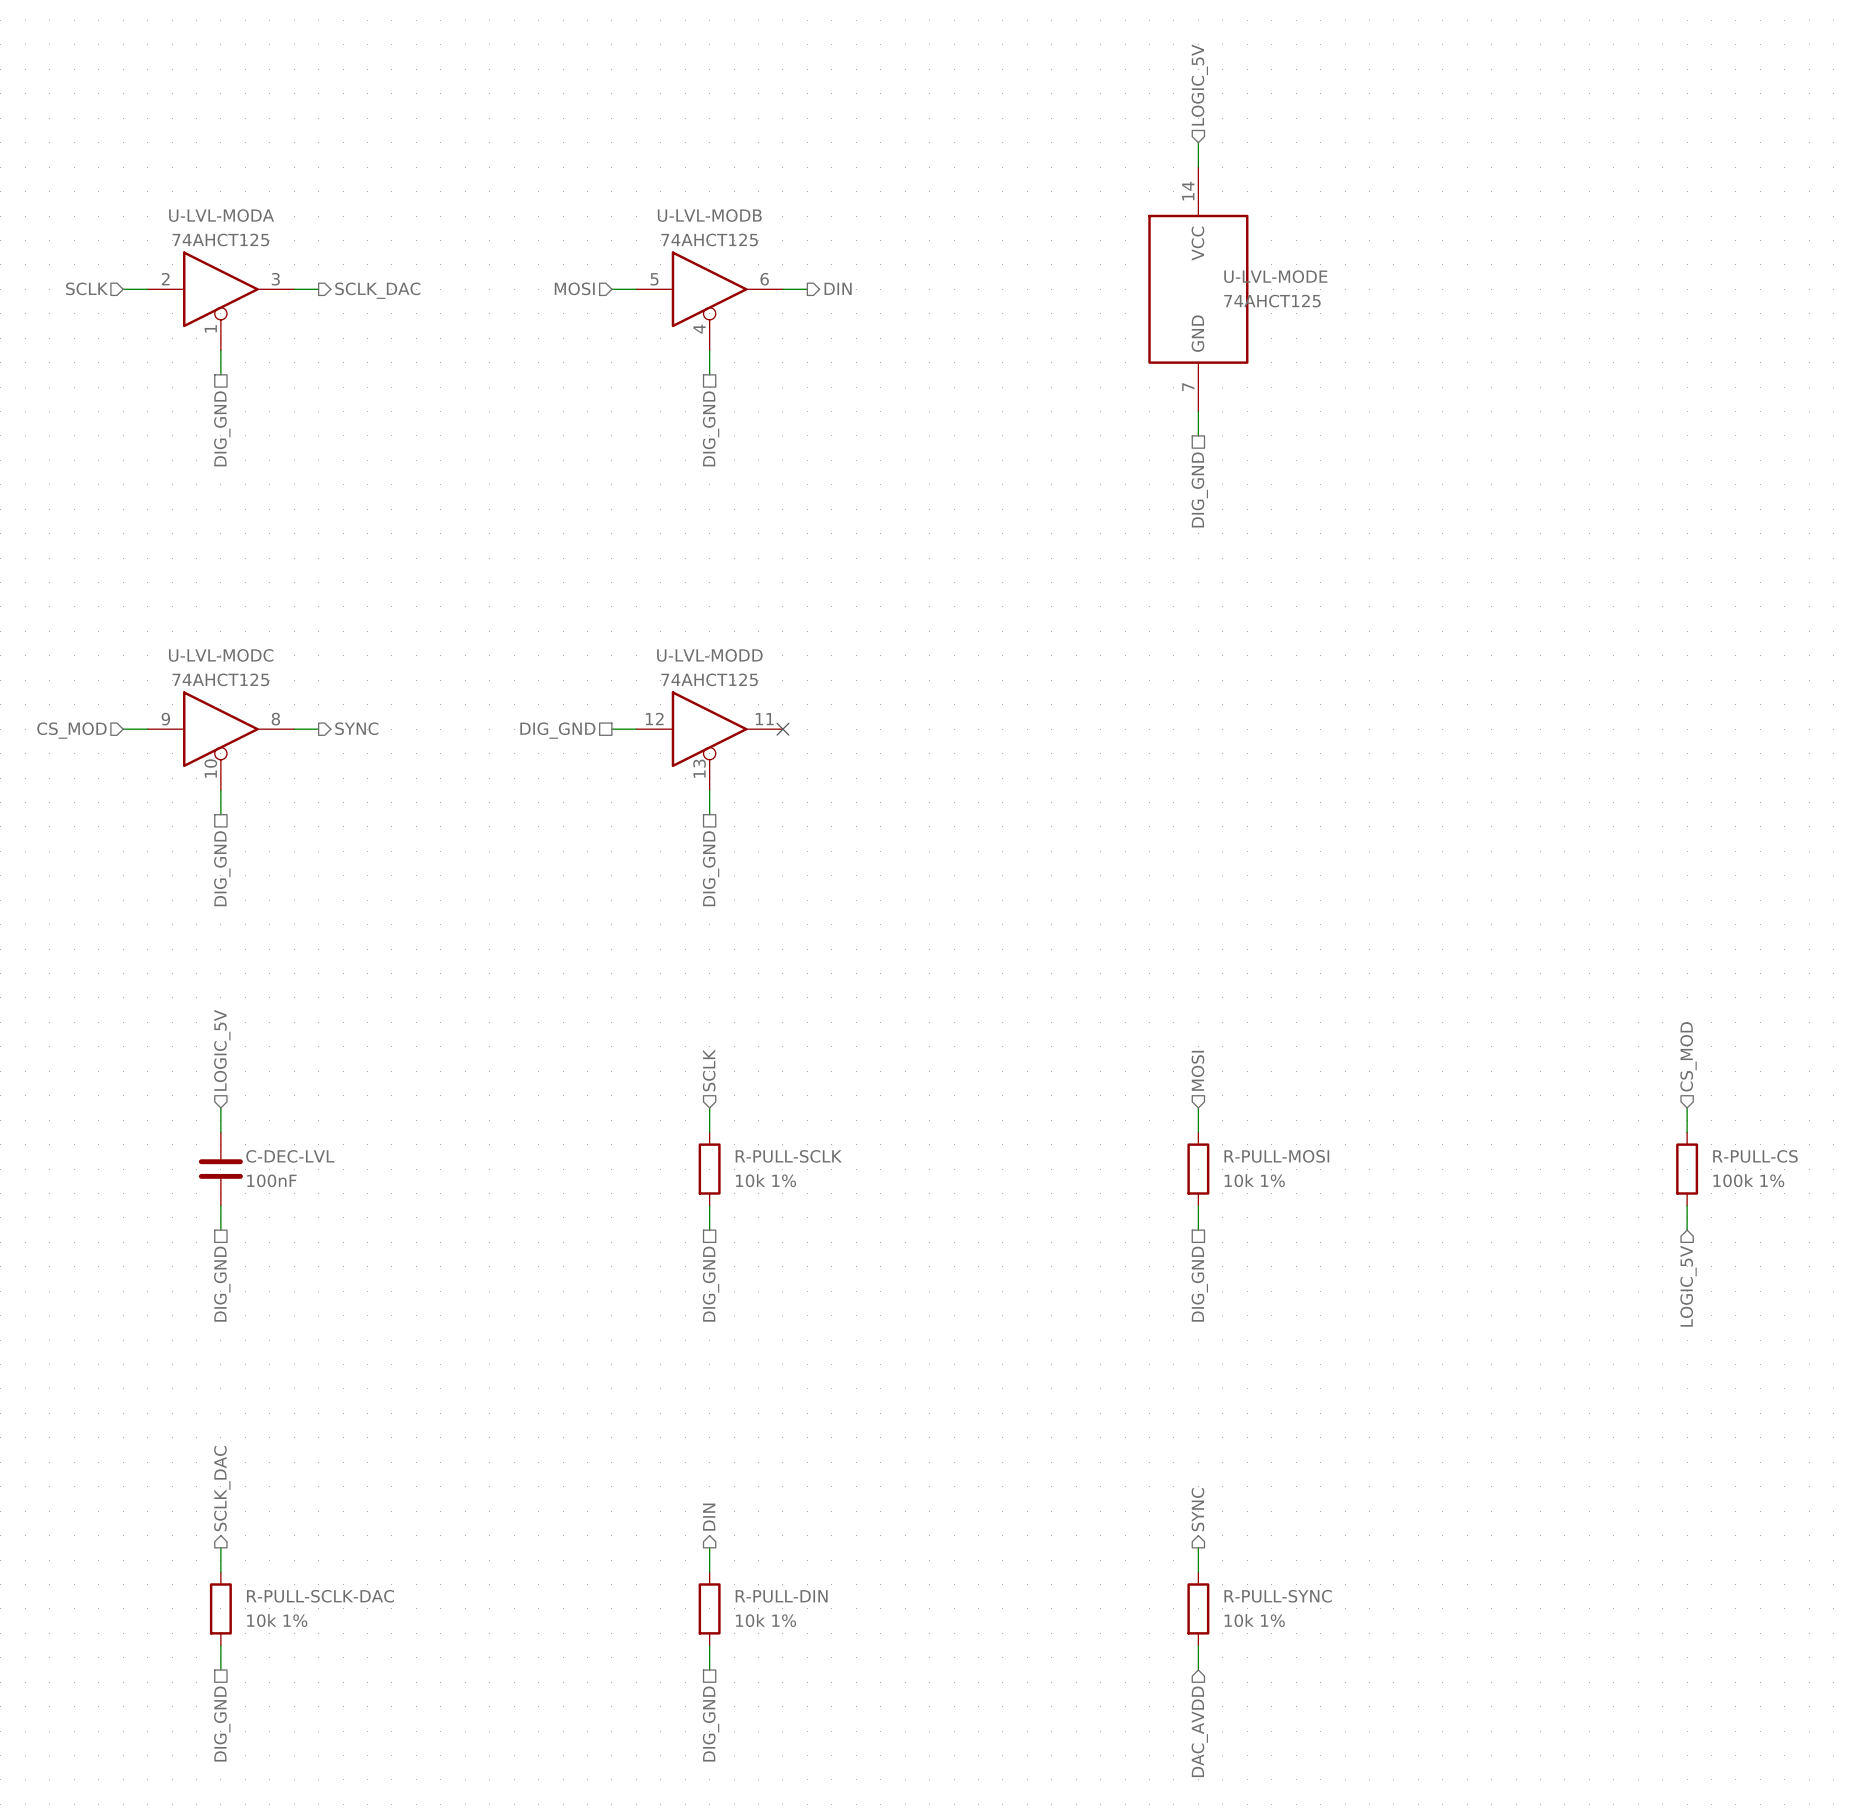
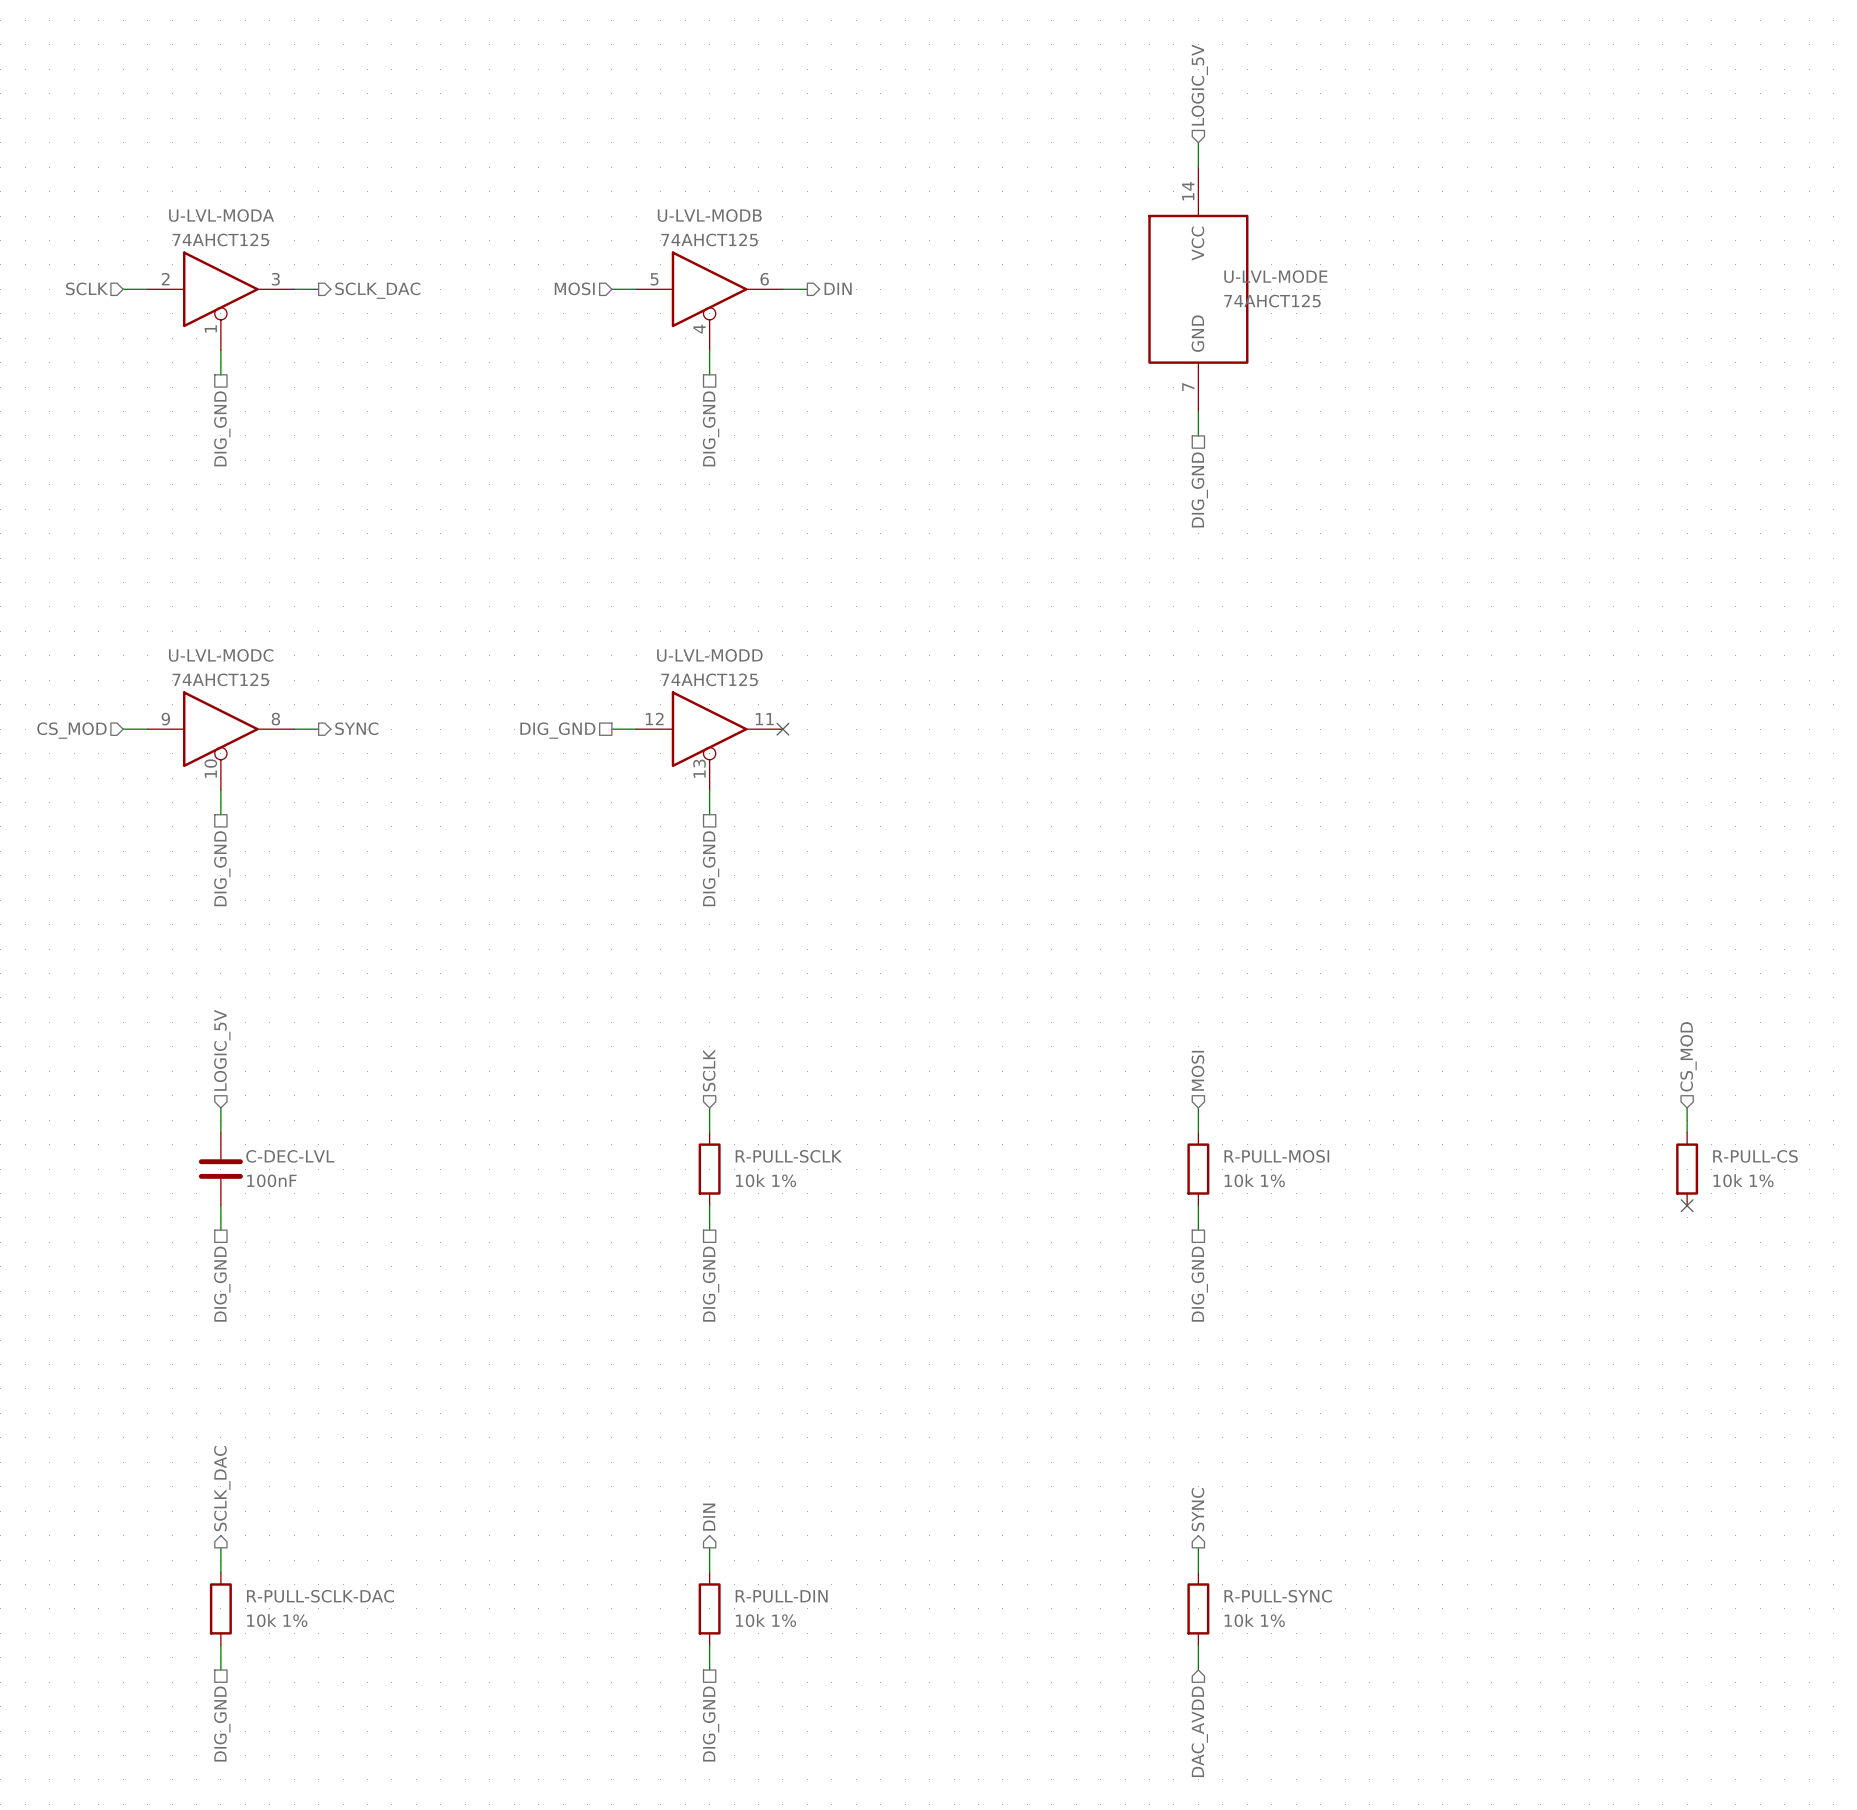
R-PULL-CS value: 100k 1% (1748, 1180) -> 10k 1% (1743, 1180)
wire: (1687, 1205) (1687, 1230) -> none
no-connect mark: none -> (1687, 1205)
hierarchical label: LOGIC_5V (1688, 1286) -> none

